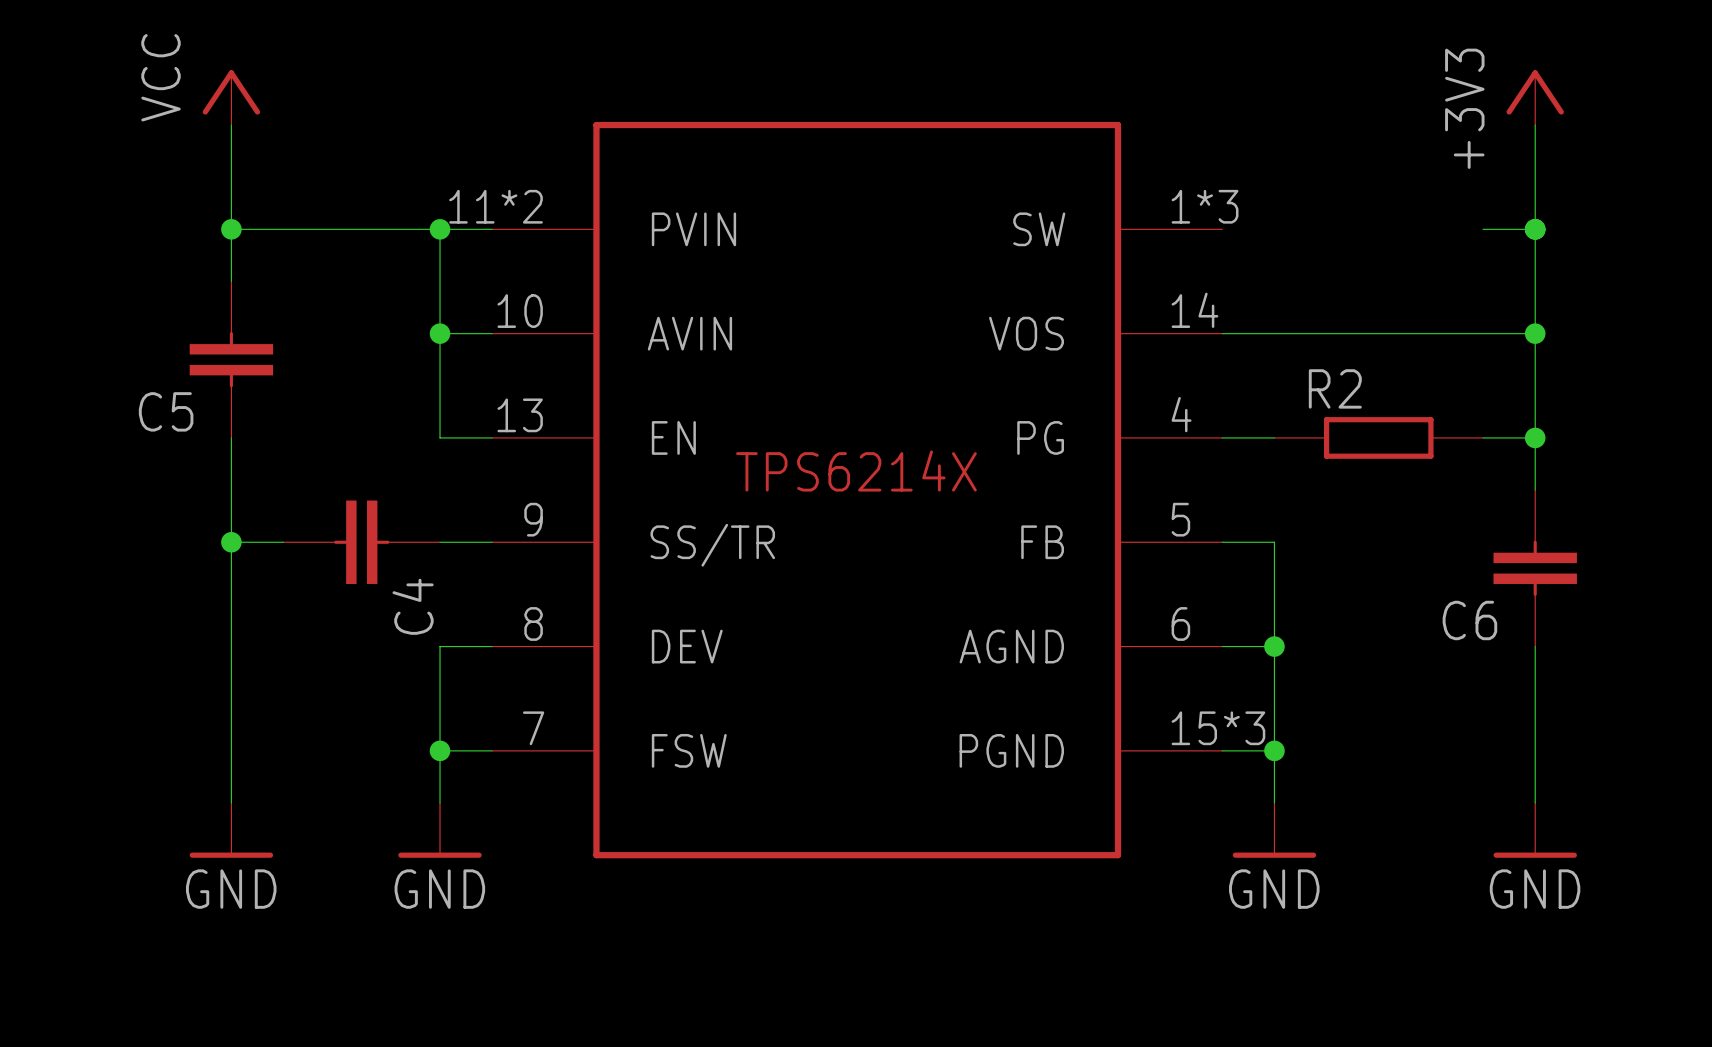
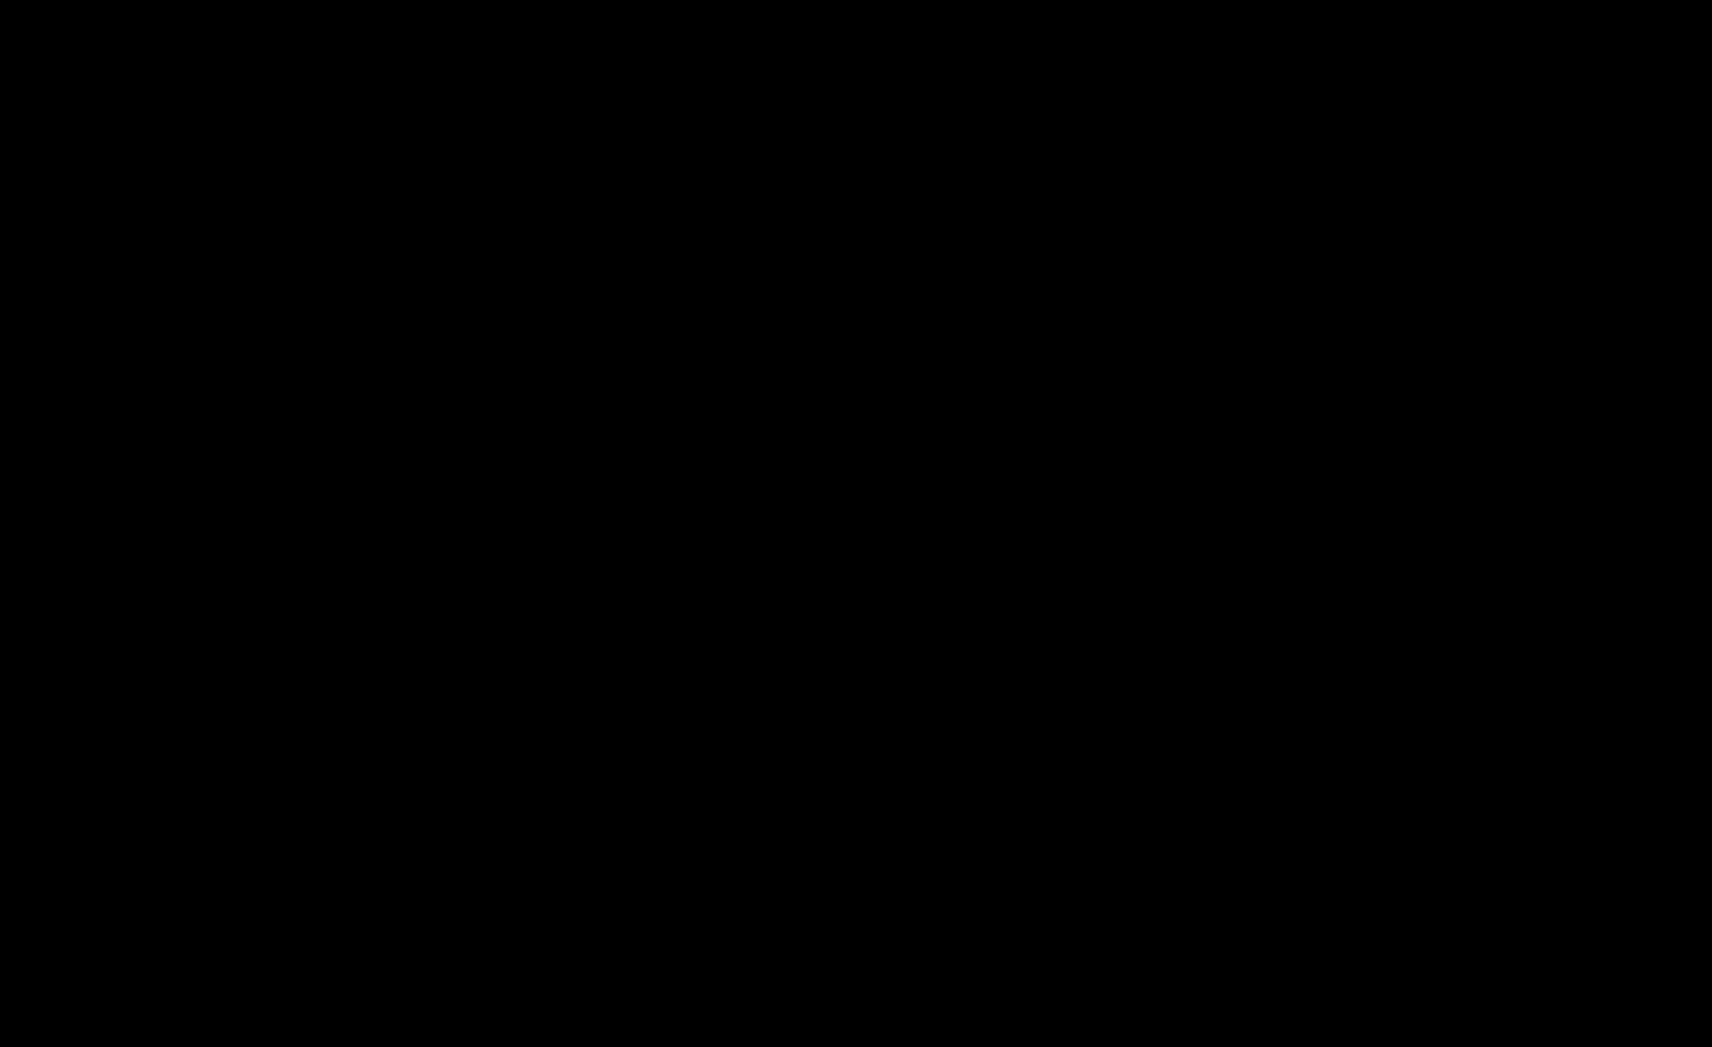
power symbol: VCC (231, 97) -> none
power symbol: +3V3 (1535, 97) -> none
wire: (231, 125) (231, 281) -> none
wire: (1535, 125) (1535, 490) -> none
wire: (231, 229) (492, 229) -> none
junction: (231, 229) -> none
wire: (440, 229) (440, 437) (492, 437) -> none
junction: (440, 229) -> none
wire: (1483, 229) (1535, 229) -> none
junction: (1535, 229) -> none
wire: (440, 333) (492, 333) -> none
junction: (440, 333) -> none
wire: (1222, 333) (1535, 333) -> none
junction: (1535, 333) -> none
C5: (231, 359) -> none
wire: (231, 437) (231, 803) -> none
wire: (1222, 437) (1274, 437) -> none
R2: (1378, 437) -> none
wire: (1483, 437) (1535, 437) -> none
junction: (1535, 437) -> none
part: (857, 490) -> none
wire: (231, 542) (283, 542) -> none
junction: (231, 542) -> none
C4: (361, 542) -> none
wire: (440, 542) (492, 542) -> none
wire: (1222, 542) (1274, 542) (1274, 803) -> none
C6: (1535, 568) -> none
wire: (492, 646) (440, 646) (440, 803) -> none
wire: (1222, 646) (1274, 646) -> none
junction: (1274, 646) -> none
wire: (1535, 646) (1535, 803) -> none
wire: (440, 750) (492, 750) -> none
junction: (440, 750) -> none
wire: (1222, 750) (1274, 750) -> none
junction: (1274, 750) -> none
power symbol: GND (231, 830) -> none
power symbol: GND (440, 830) -> none
power symbol: GND (1274, 830) -> none
power symbol: GND (1535, 830) -> none

